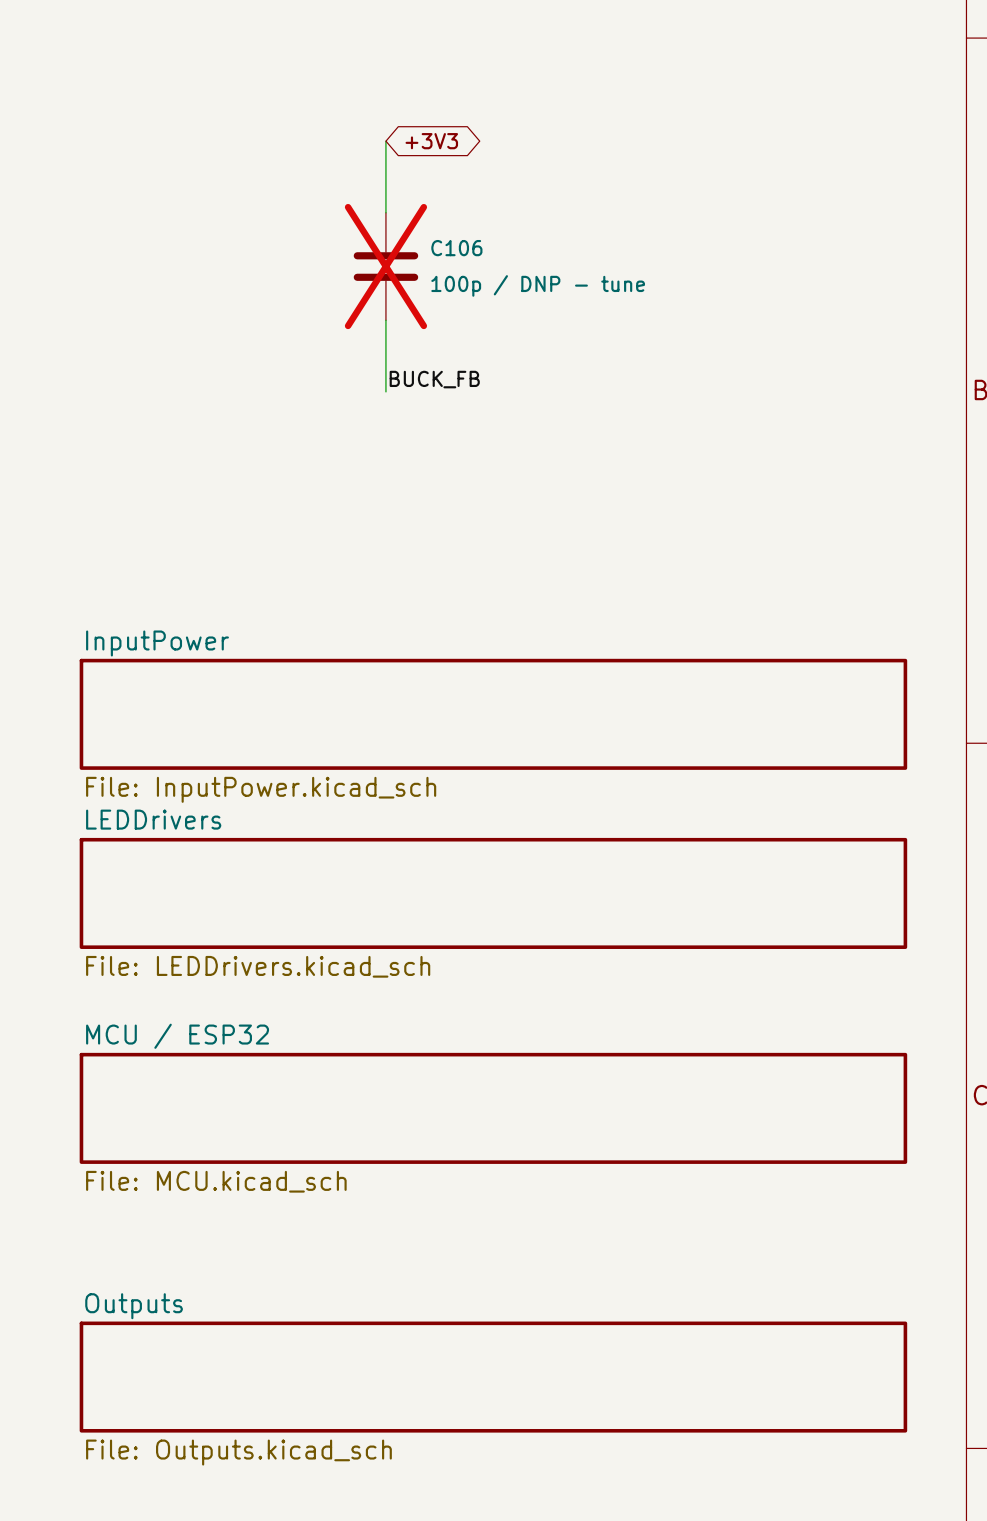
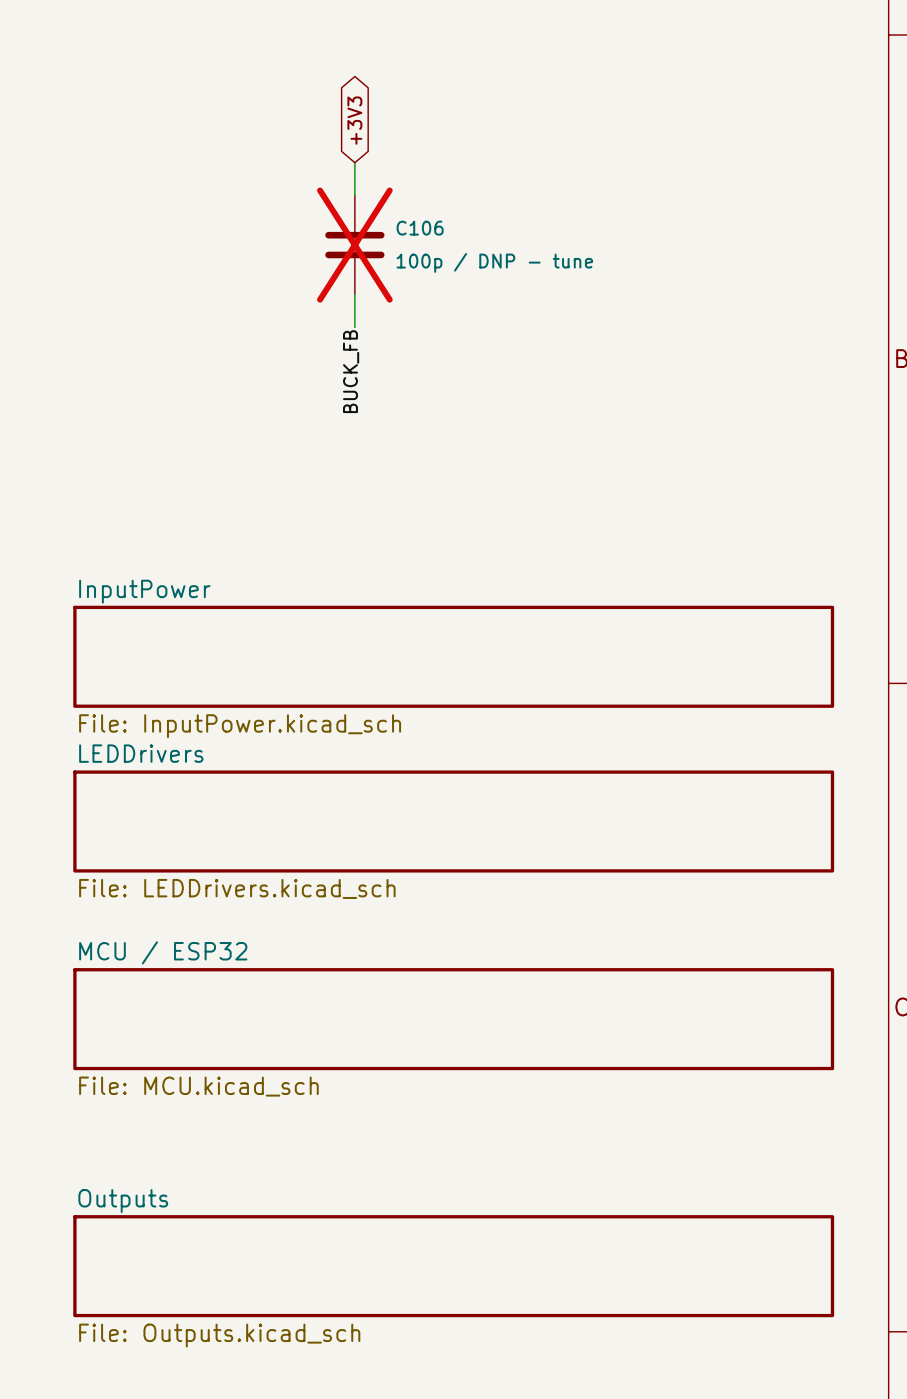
wire: (385, 141) (385, 176) -> none
global label rotation: 0° (431, 141) -> 90° counterclockwise (354, 120)
wire: (385, 356) (385, 391) -> none
label rotation: 0° (434, 379) -> 90° counterclockwise (351, 371)

